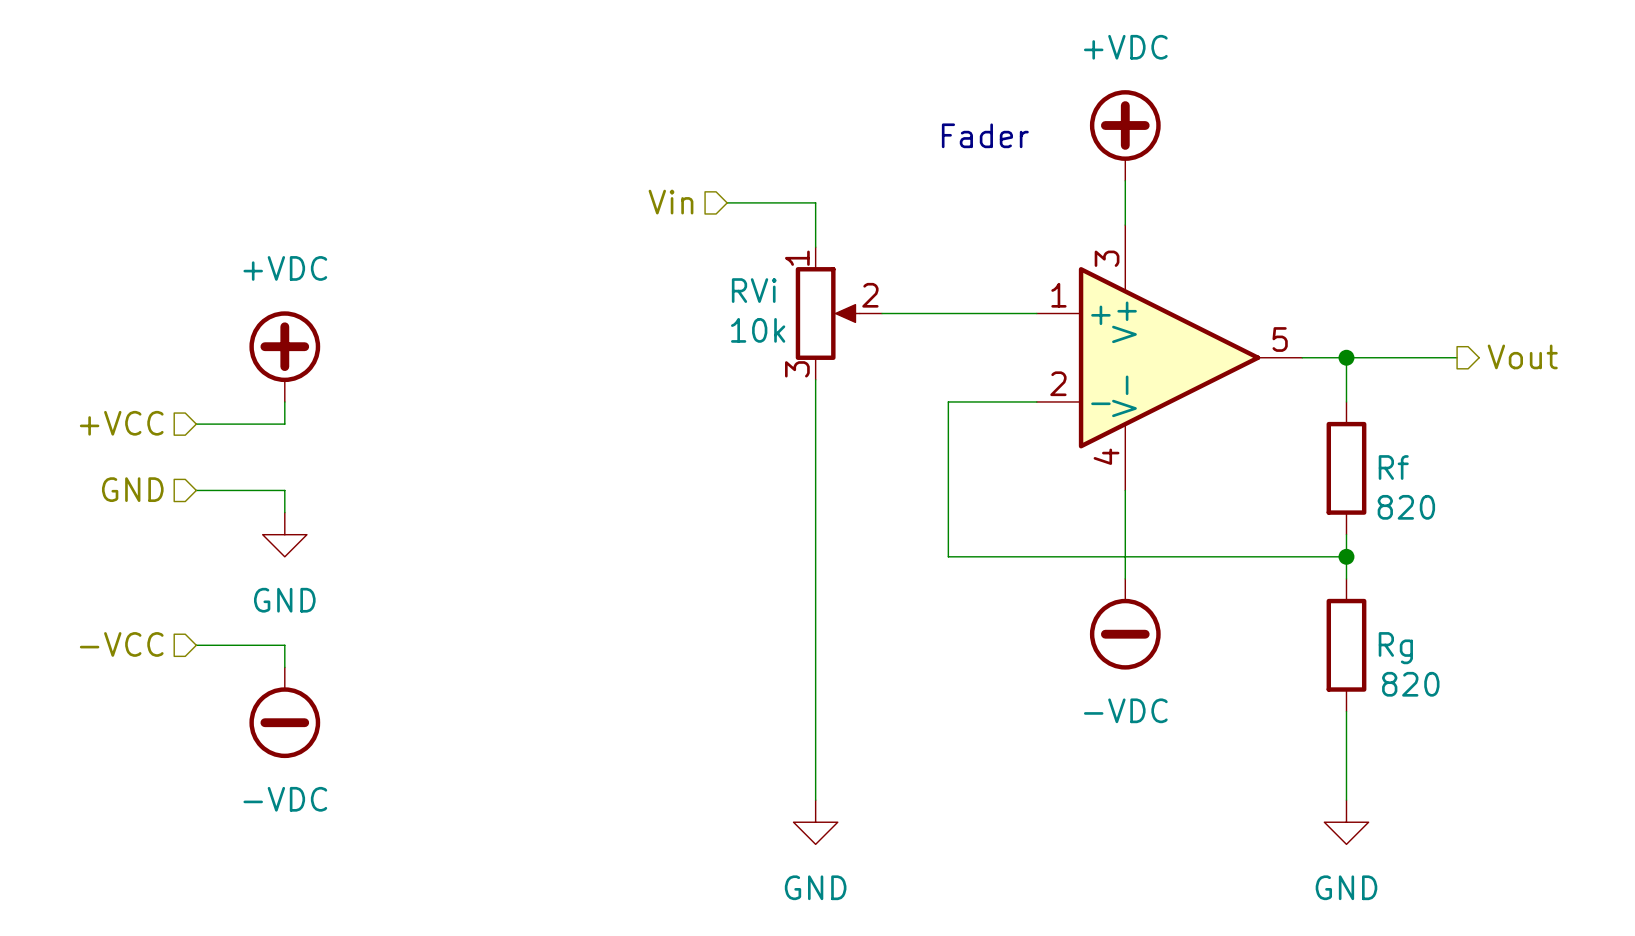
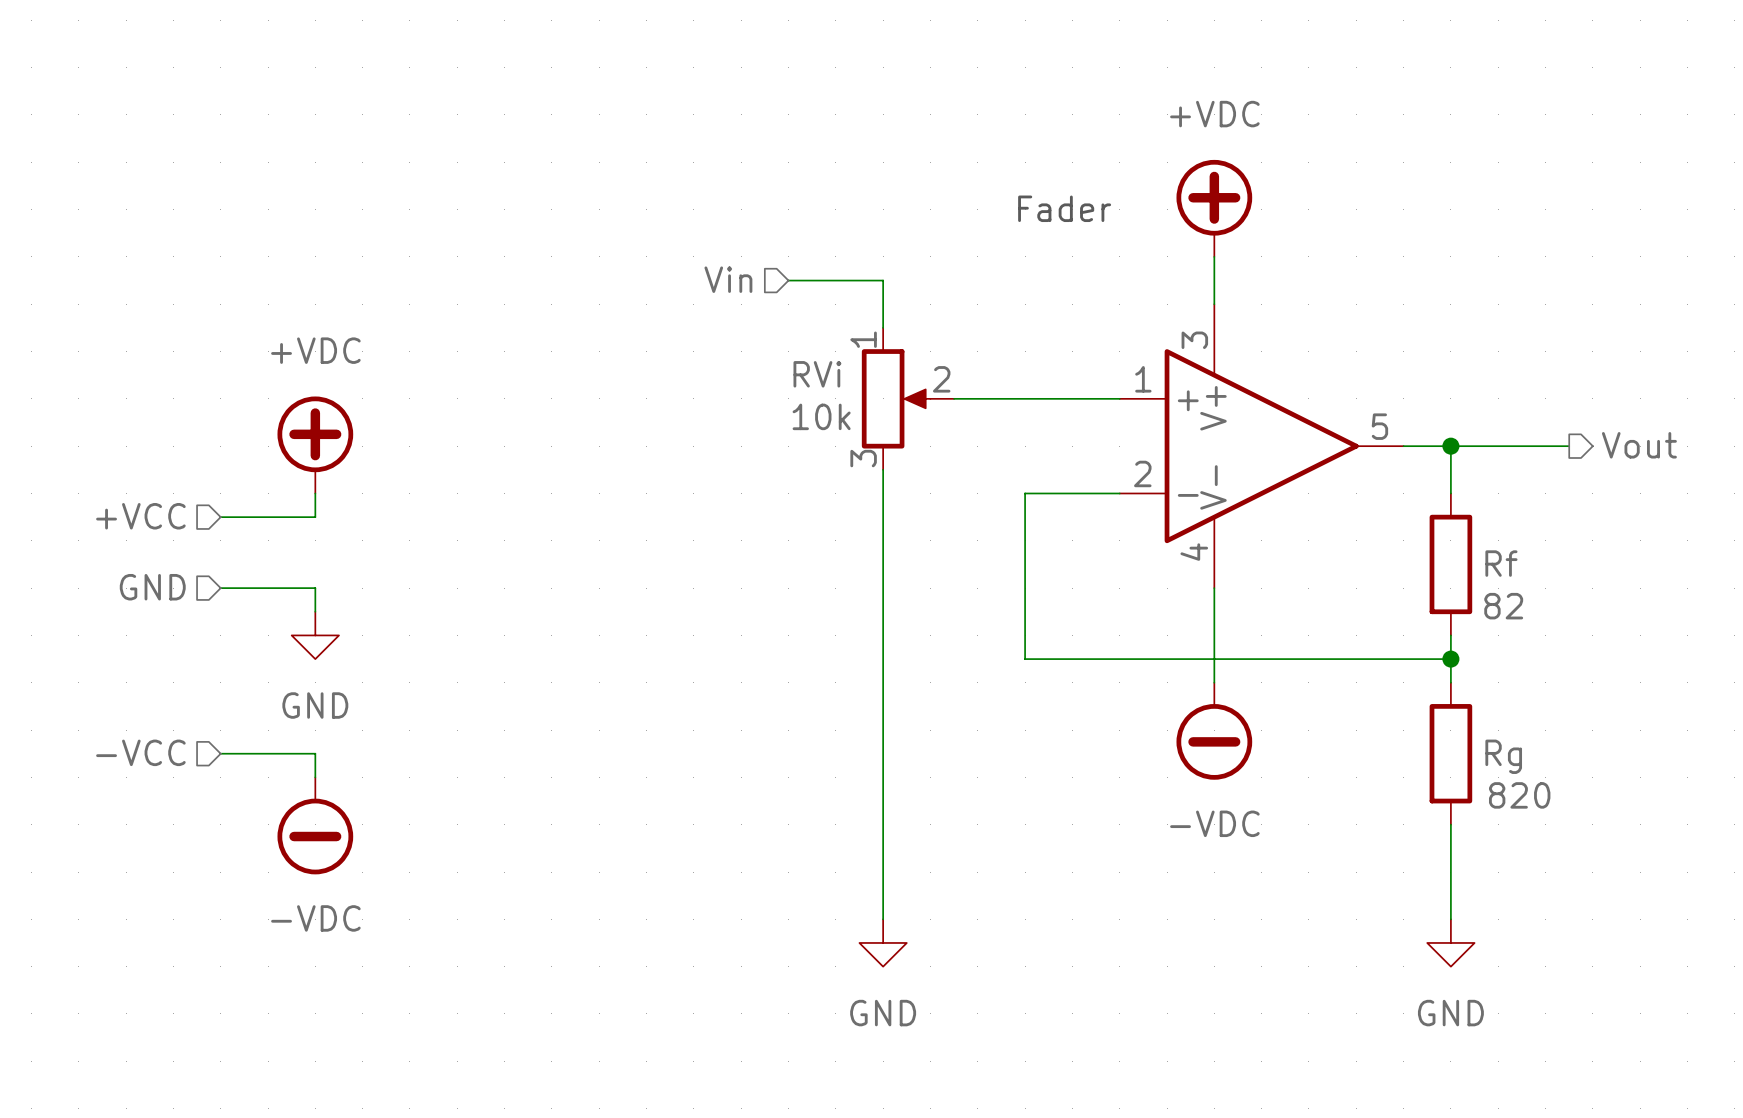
Rf value: 820 (1406, 507) -> 82 (1503, 606)

